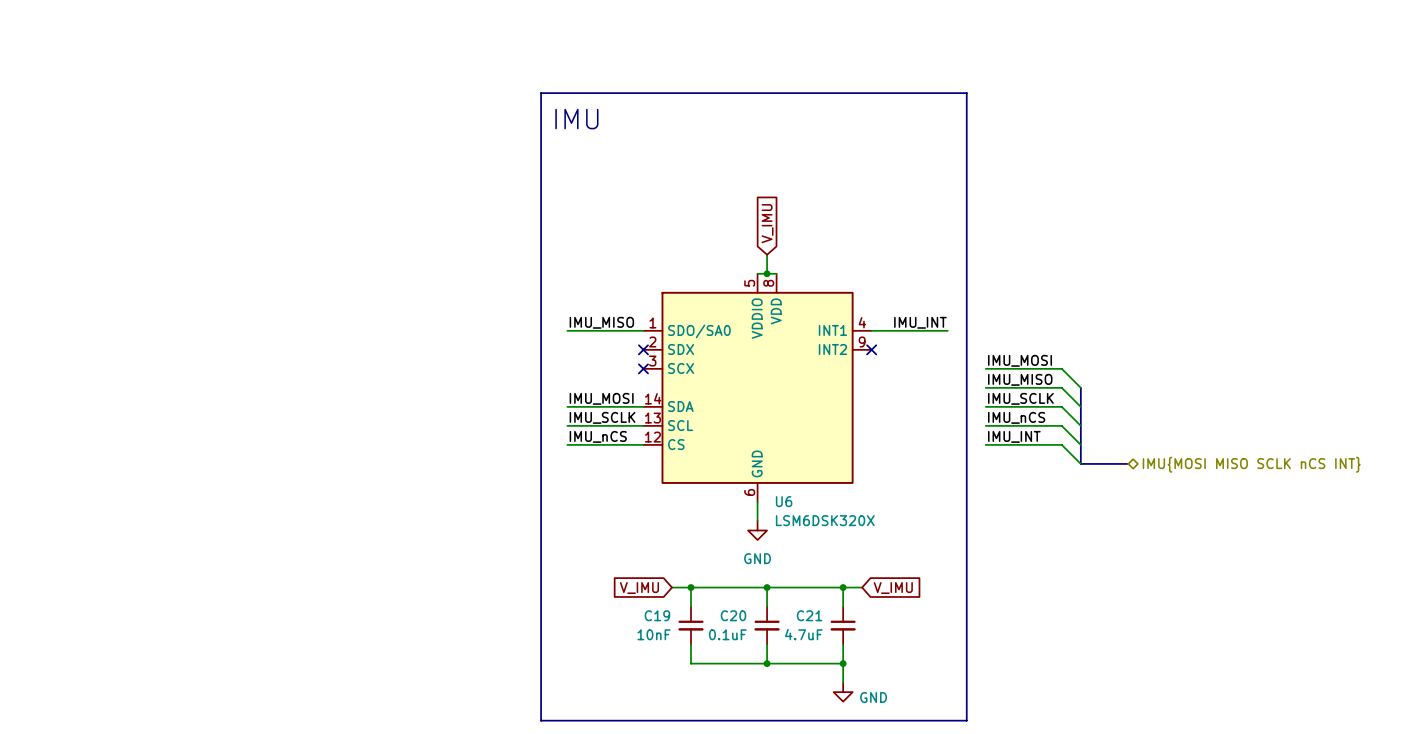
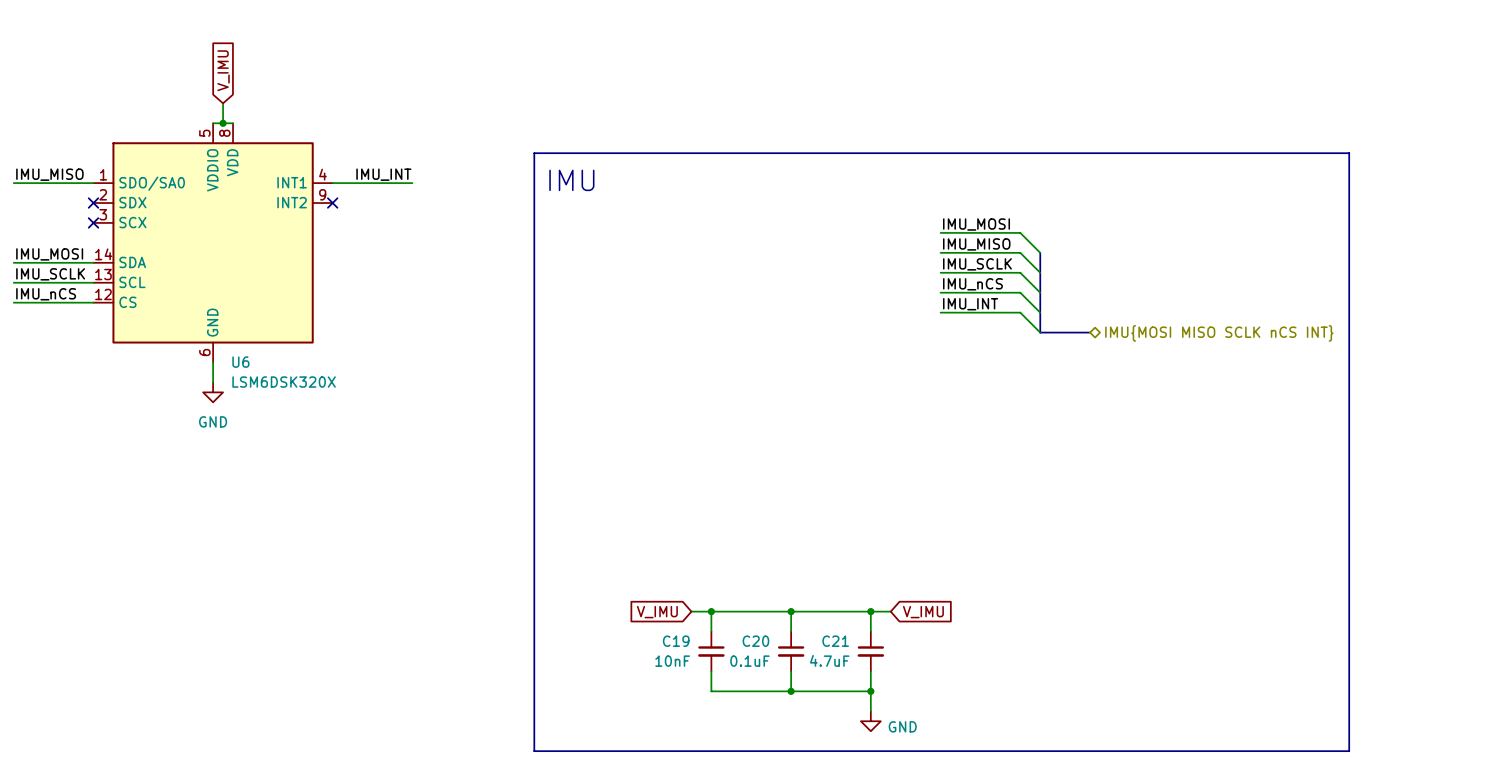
global label: none -> V_IMU (223, 70)
wire: none -> (223, 103) (223, 123)
text position: IMU (576, 119) -> IMU (571, 180)
wire: none -> (213, 123) (233, 123)
junction: none -> (223, 123)
label: none -> IMU_MISO (49, 174)
label: none -> IMU_INT (383, 174)
wire: none -> (13, 183) (93, 183)
wire: none -> (332, 183) (412, 183)
no-connect mark: none -> (93, 203)
no-connect mark: none -> (332, 203)
no-connect mark: none -> (93, 222)
global label: V_IMU (767, 223) -> none
label: none -> IMU_MOSI (49, 254)
wire: none -> (13, 262) (93, 262)
wire: (767, 254) (767, 273) -> none
label: none -> IMU_SCLK (50, 274)
wire: none -> (13, 282) (93, 282)
wire: (757, 273) (776, 273) -> none
junction: (767, 273) -> none
label: none -> IMU_nCS (46, 294)
wire: none -> (13, 302) (93, 302)
label: IMU_MISO (601, 322) -> none
label position: IMU_INT (920, 322) -> IMU_INT (970, 304)
wire: (567, 330) (643, 330) -> none
wire: (871, 330) (947, 330) -> none
wire: none -> (213, 362) (213, 382)
no-connect mark: (643, 349) -> none
no-connect mark: (871, 349) -> none
label position: IMU_MOSI (1020, 360) -> IMU_MOSI (976, 224)
no-connect mark: (643, 368) -> none
wire: (985, 368) (1061, 368) (1080, 387) -> (940, 232) (1020, 232) (1040, 252)
power symbol: none -> GND (213, 392)
label position: IMU_MISO (1020, 379) -> IMU_MISO (976, 244)
U6 position: (757, 387) -> (213, 242)
wire: (985, 387) (1061, 387) (1080, 406) -> (940, 252) (1020, 252) (1040, 272)
bus: (1080, 387) (1080, 463) (1128, 463) -> (1040, 252) (1040, 332) (1090, 332)
label: IMU_MOSI (601, 398) -> none
label position: IMU_SCLK (1020, 398) -> IMU_SCLK (977, 264)
wire: (567, 406) (643, 406) -> none
wire: (985, 406) (1061, 406) (1080, 425) -> (940, 272) (1020, 272) (1040, 292)
label: IMU_SCLK (602, 417) -> none
label position: IMU_nCS (1016, 417) -> IMU_nCS (972, 284)
wire: (567, 425) (643, 425) -> none
wire: (985, 425) (1061, 425) (1080, 444) -> (940, 292) (1020, 292) (1040, 312)
label: IMU_nCS (598, 436) -> none
label: IMU_INT (1014, 436) -> none
wire: (567, 444) (643, 444) -> none
wire: (985, 444) (1061, 444) (1080, 463) -> (940, 312) (1020, 312) (1040, 332)
hierarchical label position: IMU{MOSI MISO SCLK nCS INT} (1251, 464) -> IMU{MOSI MISO SCLK nCS INT} (1219, 333)
wire: (757, 501) (757, 520) -> none
power symbol: GND (757, 530) -> none
line: (541, 720) (541, 93) (966, 93) (966, 720) -> (554, 751) (534, 751) (534, 153) (1349, 153) (1349, 751) (1000, 751)

